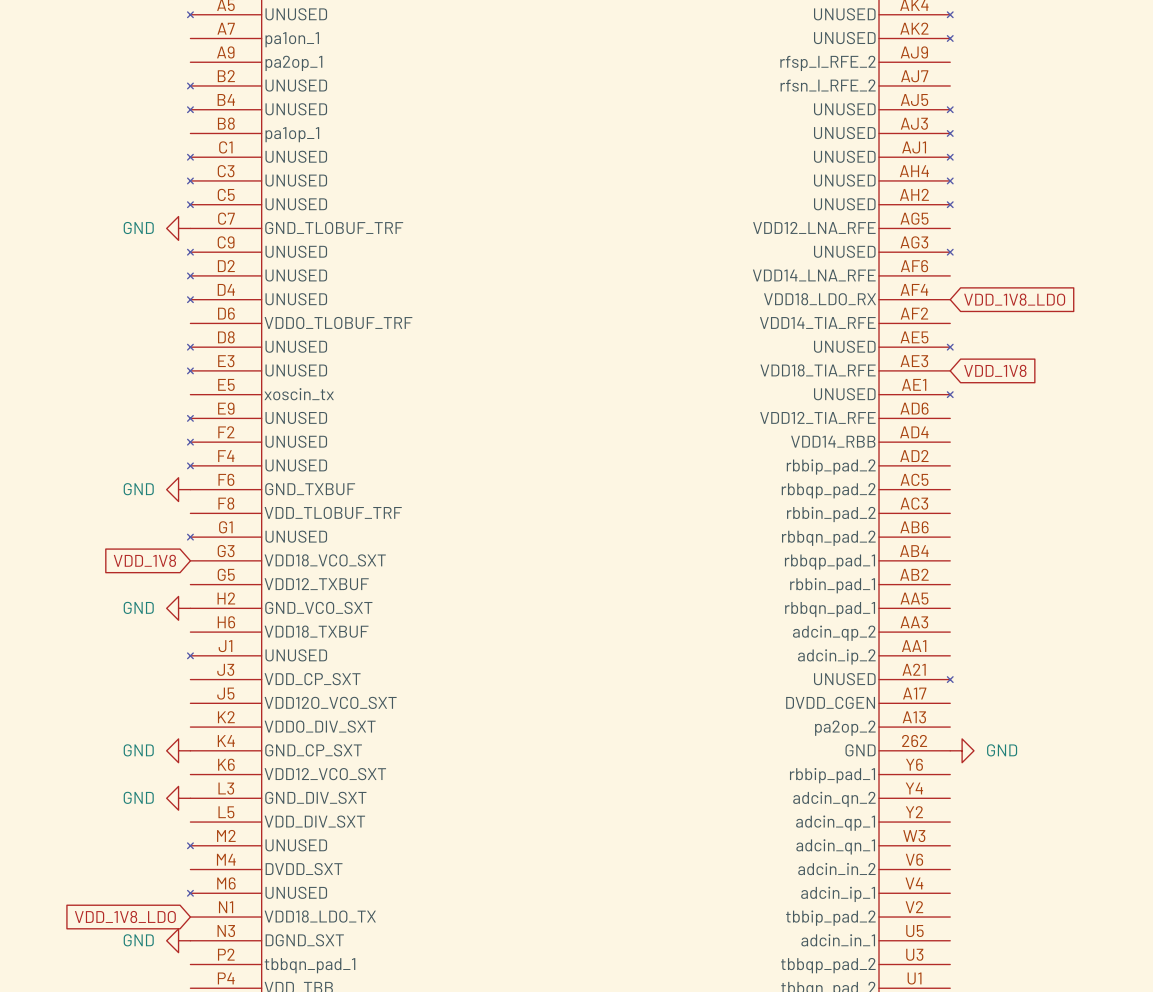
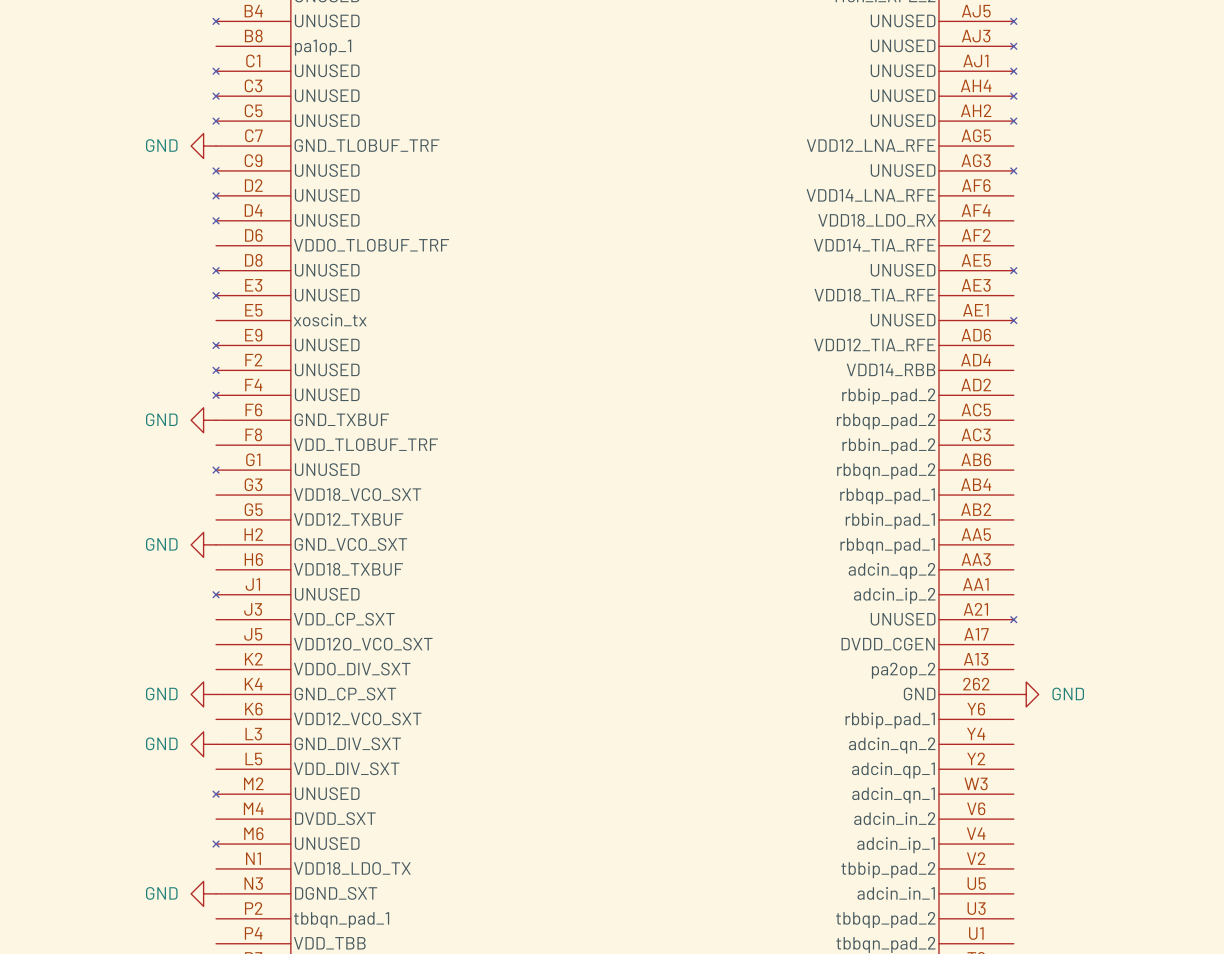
global label: VDD_1V8_LDO (1014, 299) -> none
global label: VDD_1V8 (995, 370) -> none
global label: VDD_1V8 (144, 560) -> none
global label: VDD_1V8_LDO (125, 916) -> none

